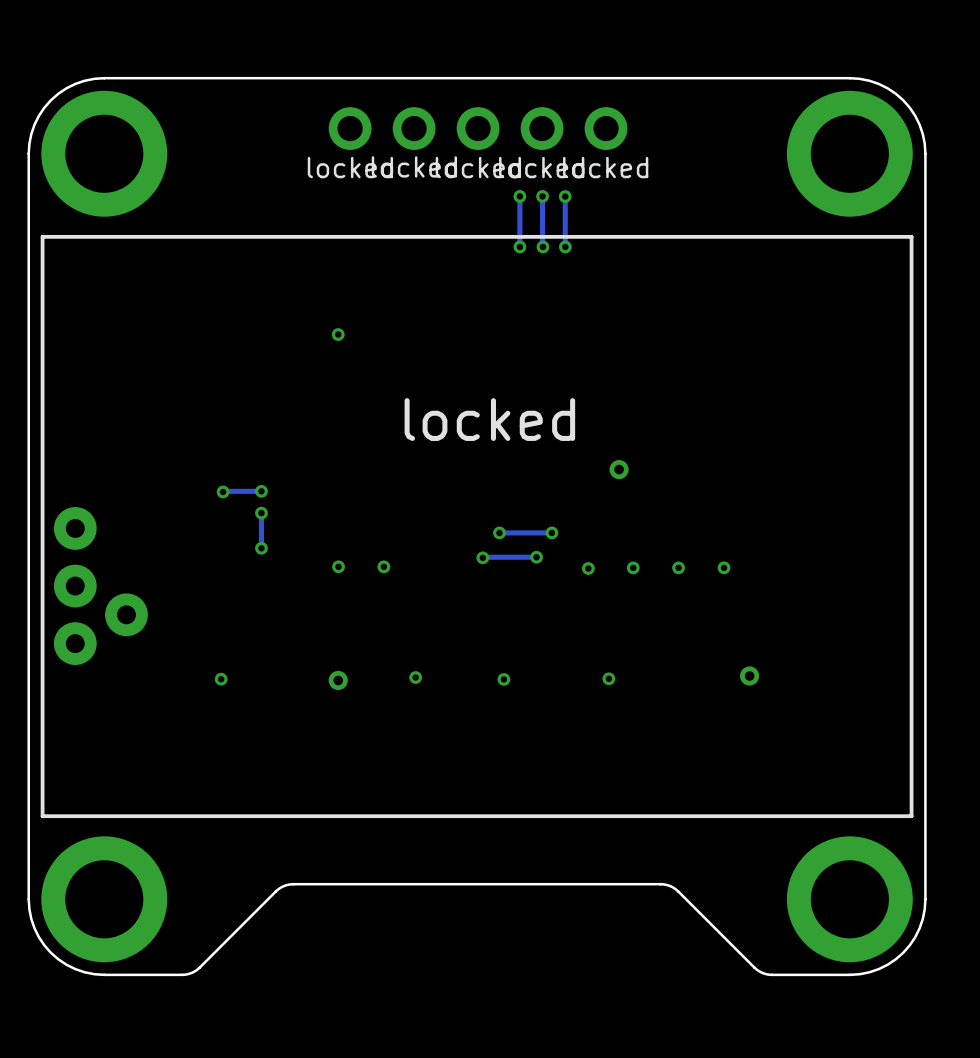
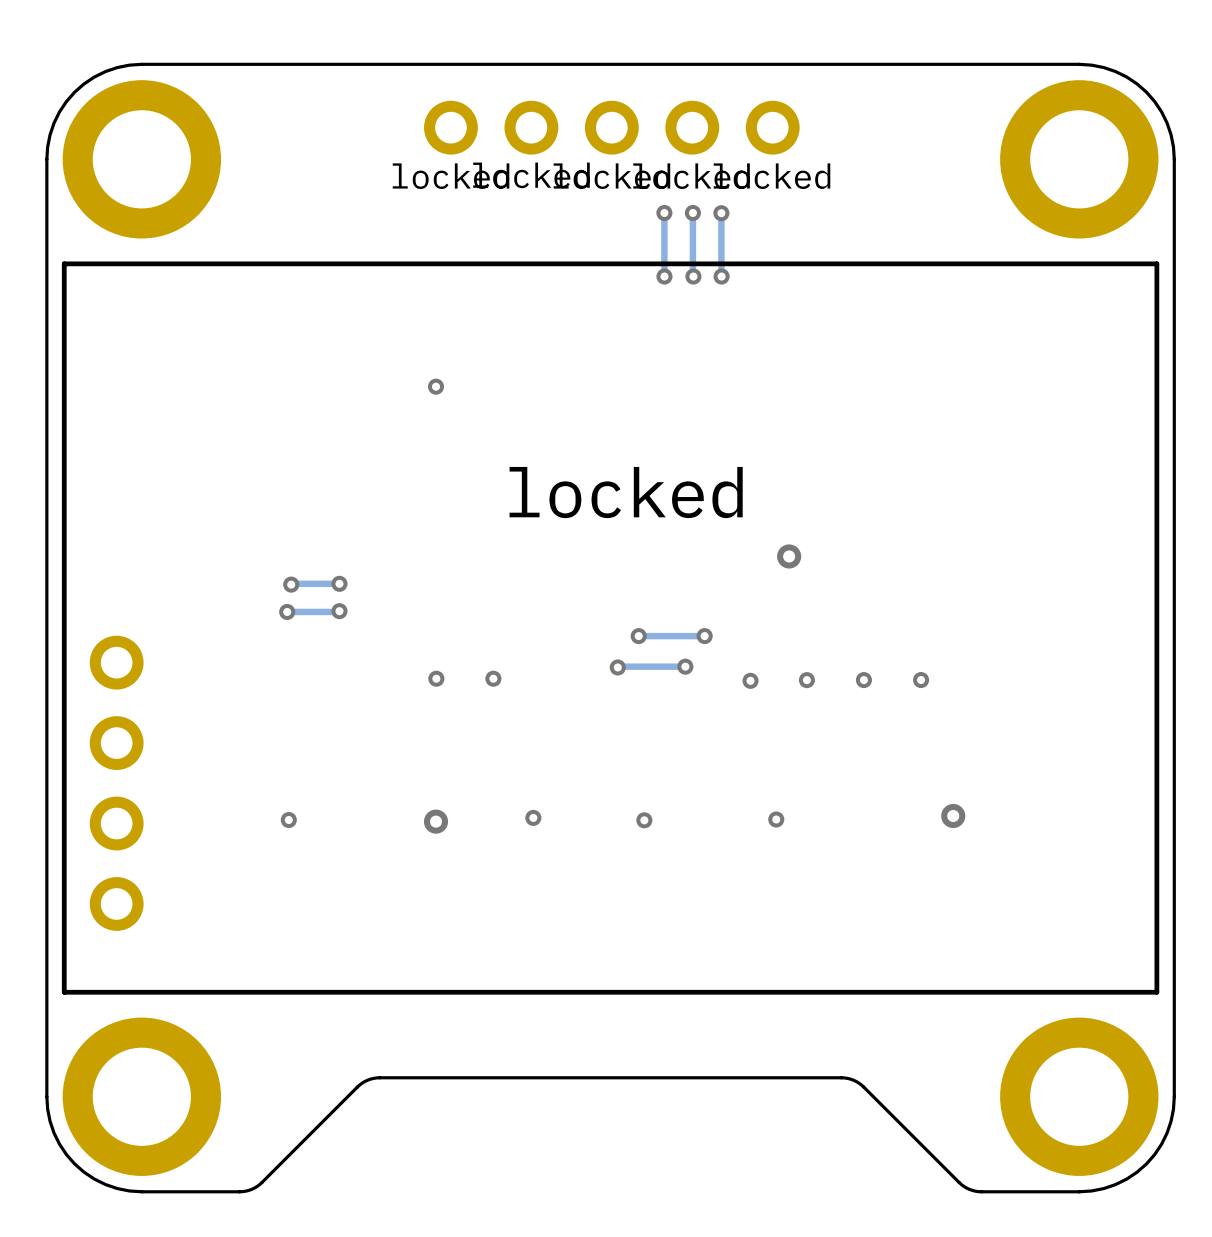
track: (261, 513) (261, 548) -> none
track: none -> (343, 611) (286, 611)
via position: (261, 548) -> (287, 611)
part: (100, 586) -> none
part: none -> (116, 783)

